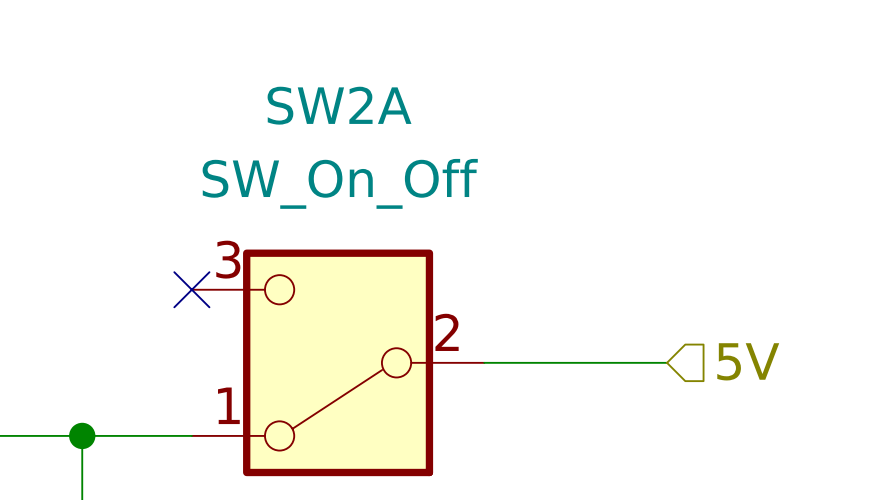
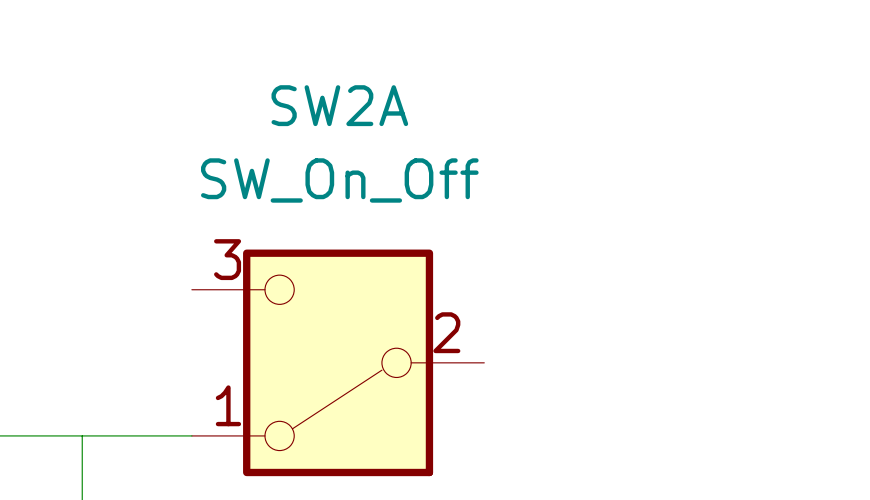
no-connect mark: (191, 289) -> none
hierarchical label: 5V (748, 361) -> none
wire: (484, 362) (667, 362) -> none
junction: (82, 435) -> none

